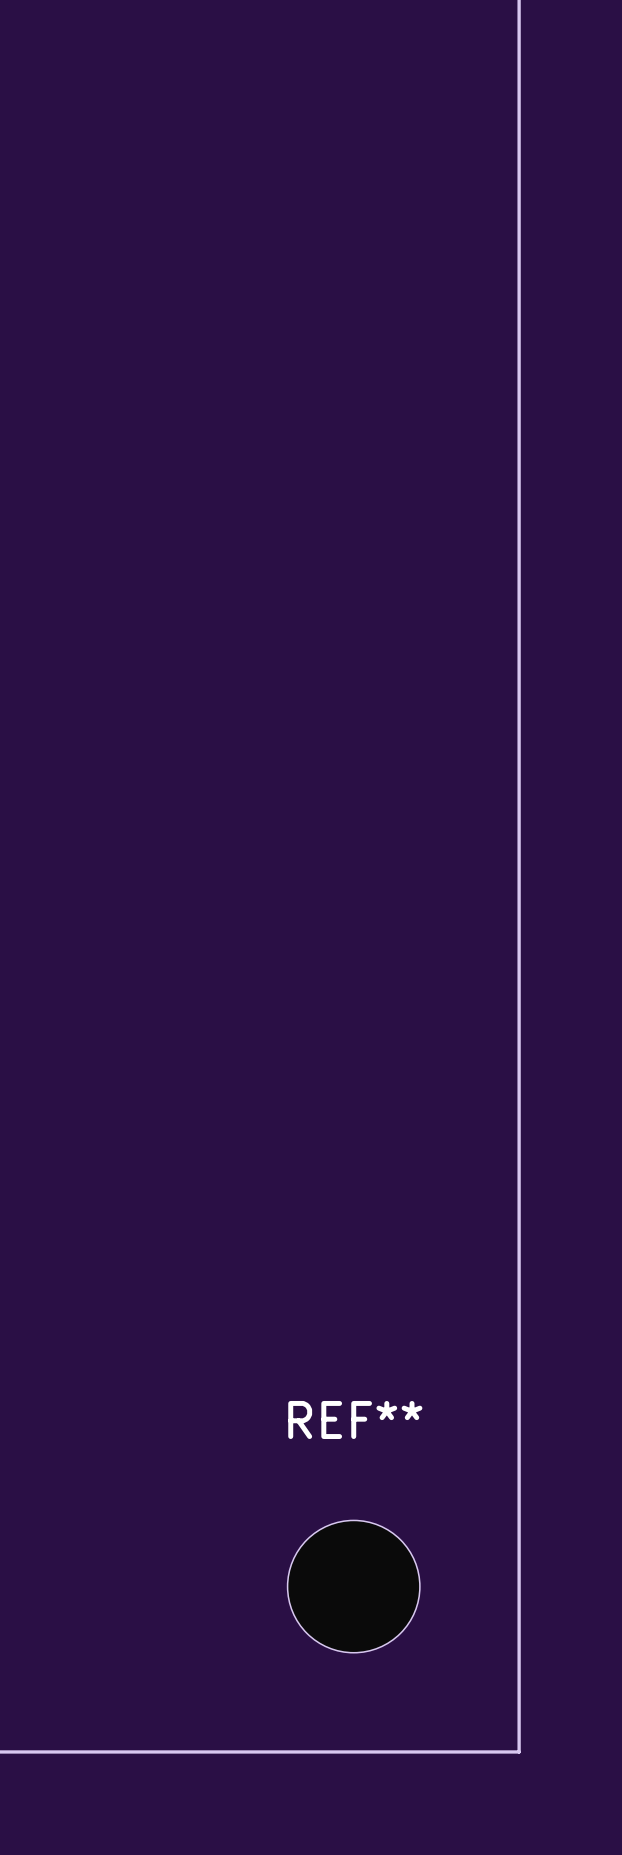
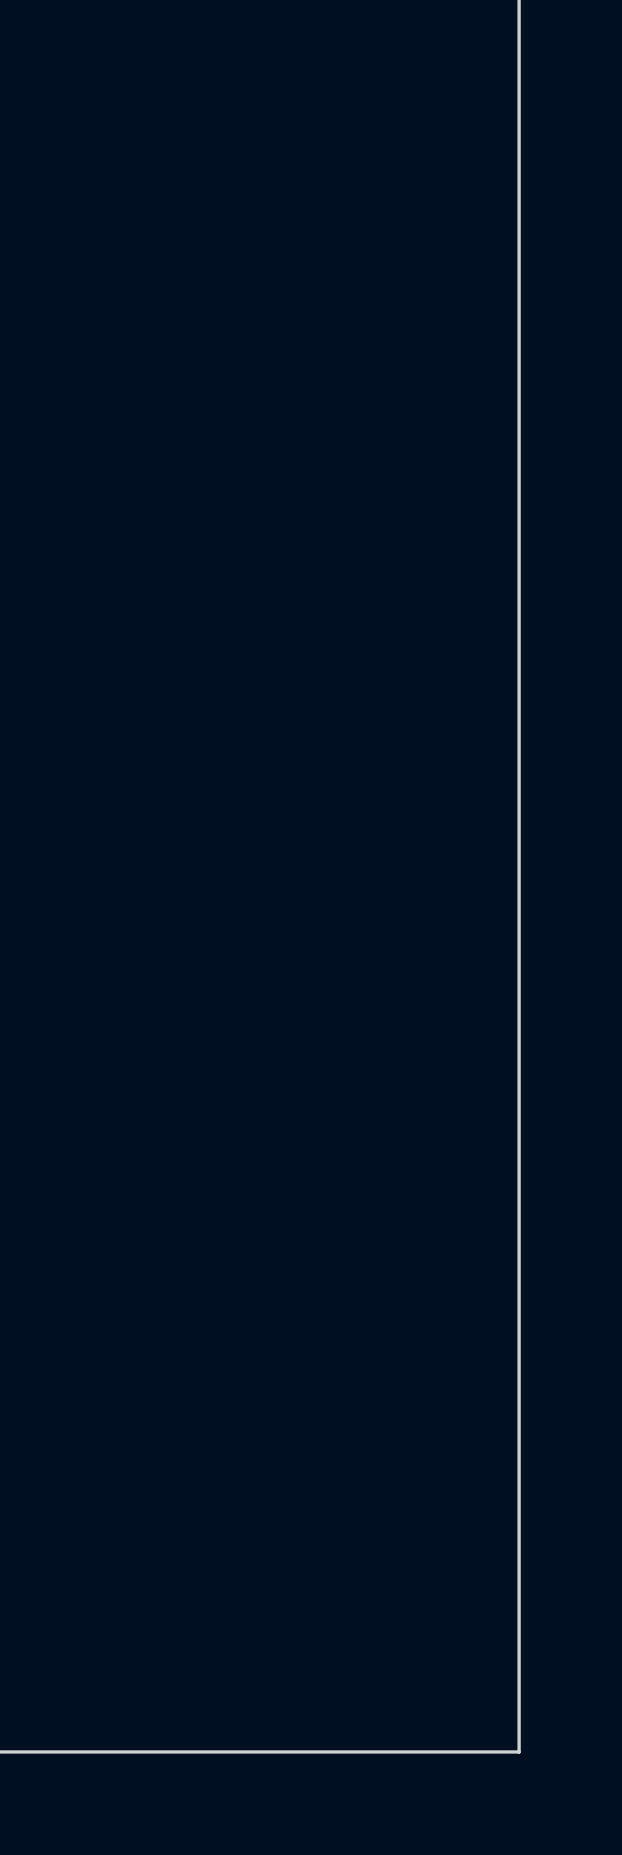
REF**: (353, 1586) -> none

